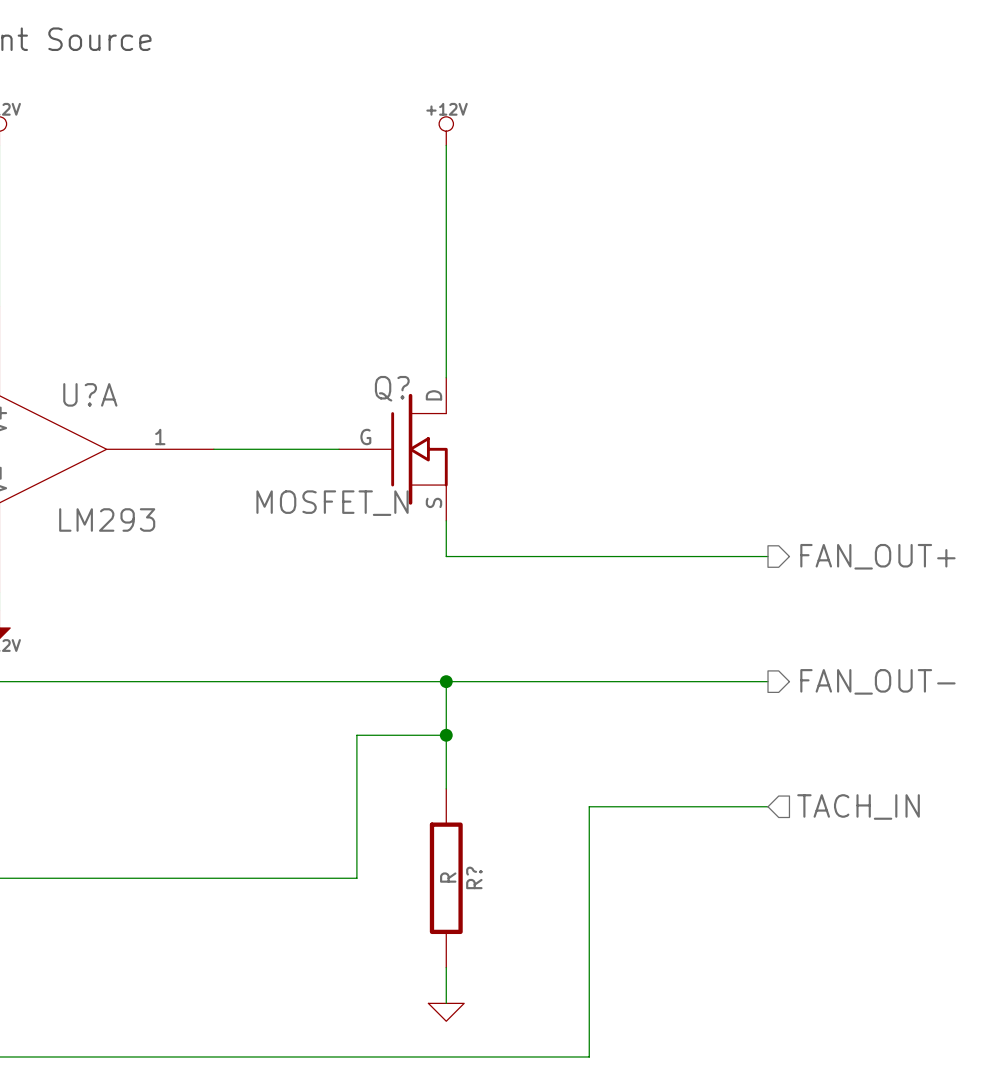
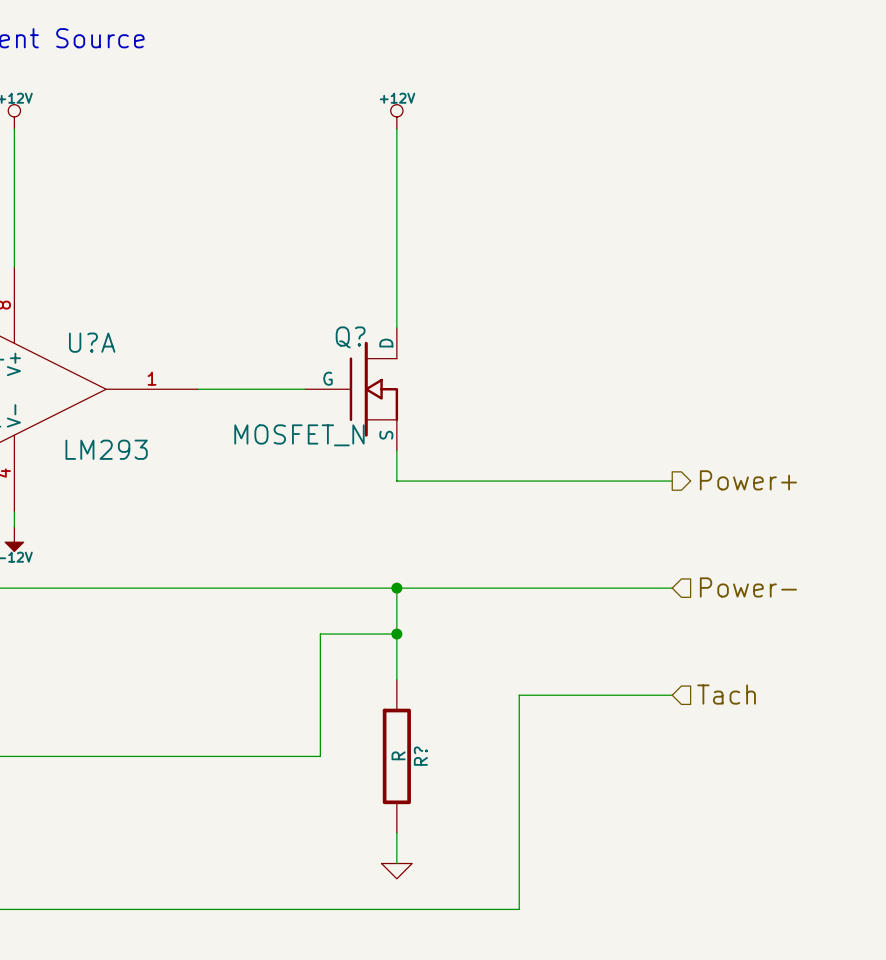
hierarchical label: FAN_OUT+ (877, 556) -> Power+ (748, 480)
hierarchical label shape: output (877, 681) -> input (748, 587)
hierarchical label: FAN_OUT- (877, 681) -> Power- (748, 587)
hierarchical label: TACH_IN (858, 806) -> Tach (726, 694)

